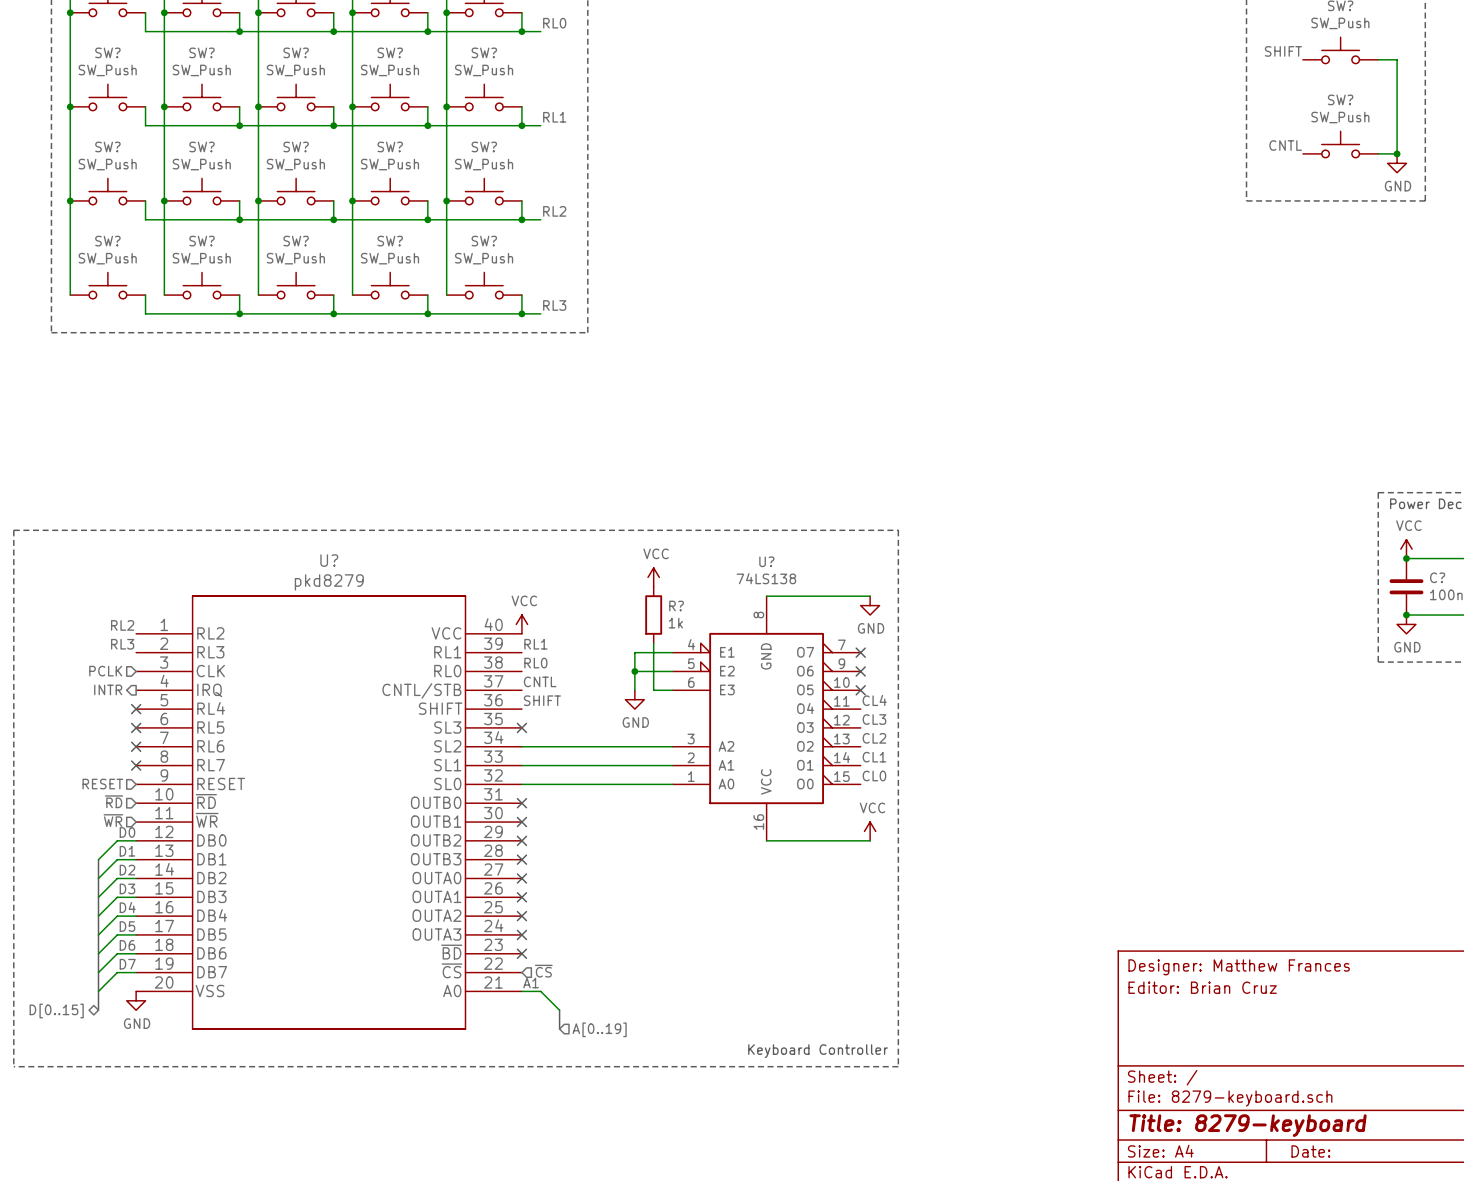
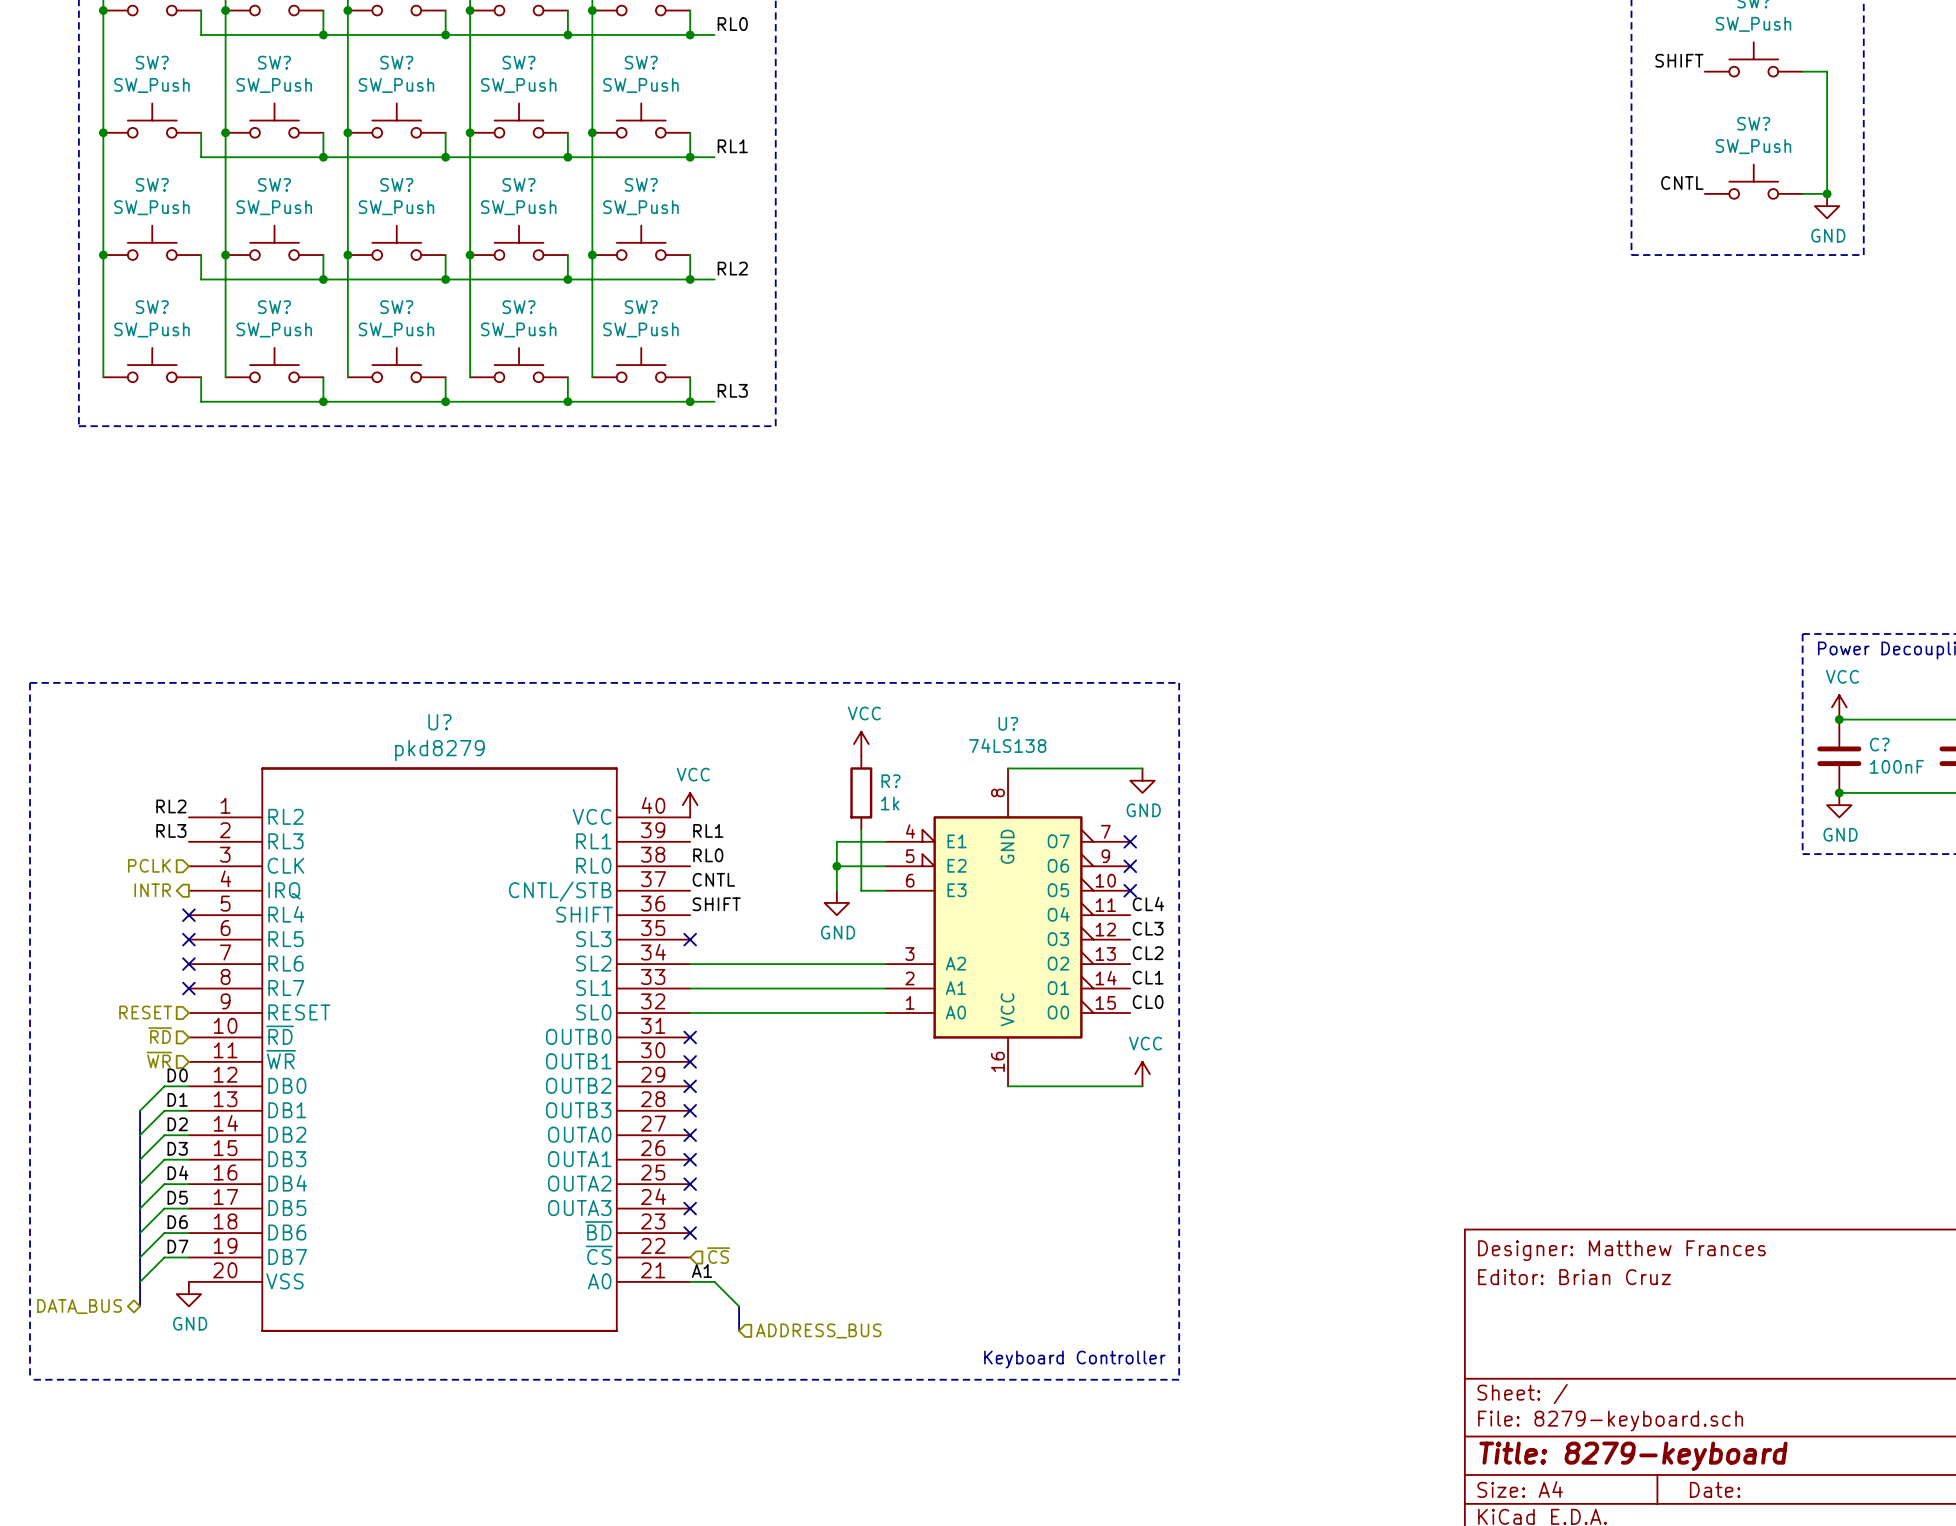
hierarchical label: D[0..15] (56, 1010) -> DATA_BUS (79, 1306)
hierarchical label: A[0..19] (599, 1029) -> ADDRESS_BUS (818, 1330)

